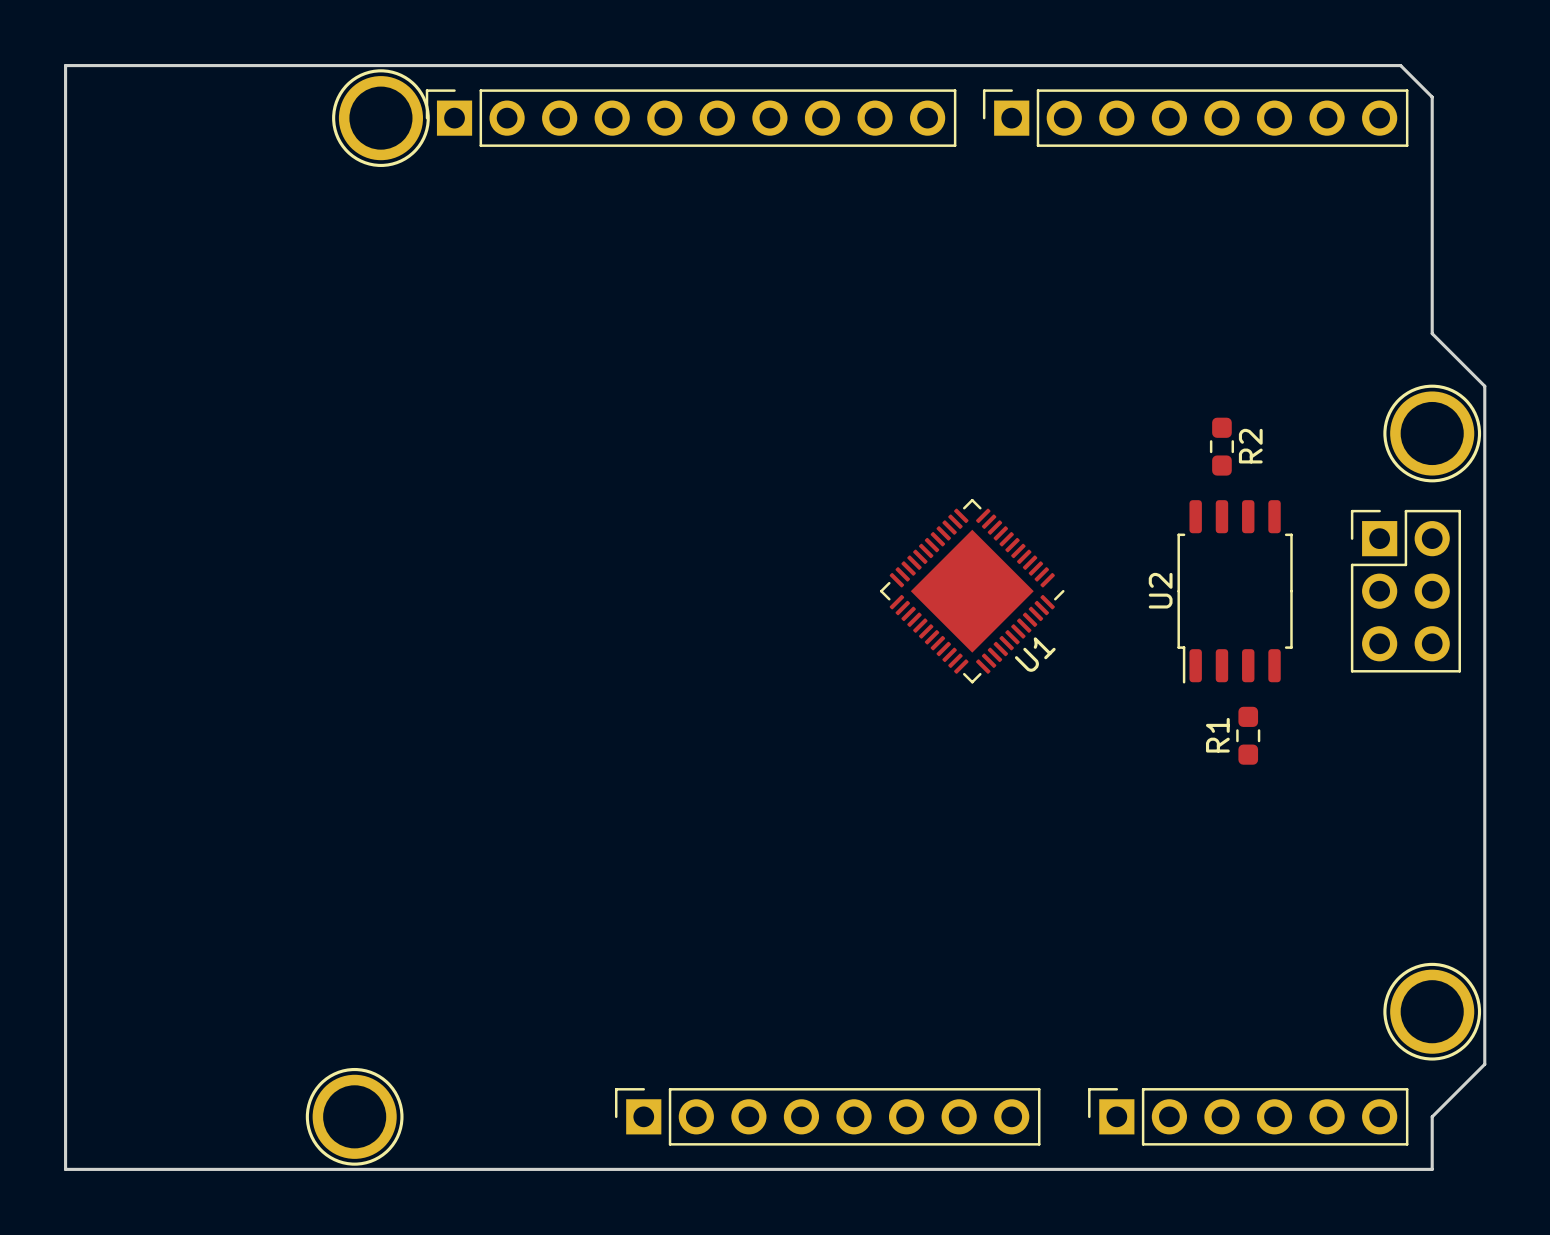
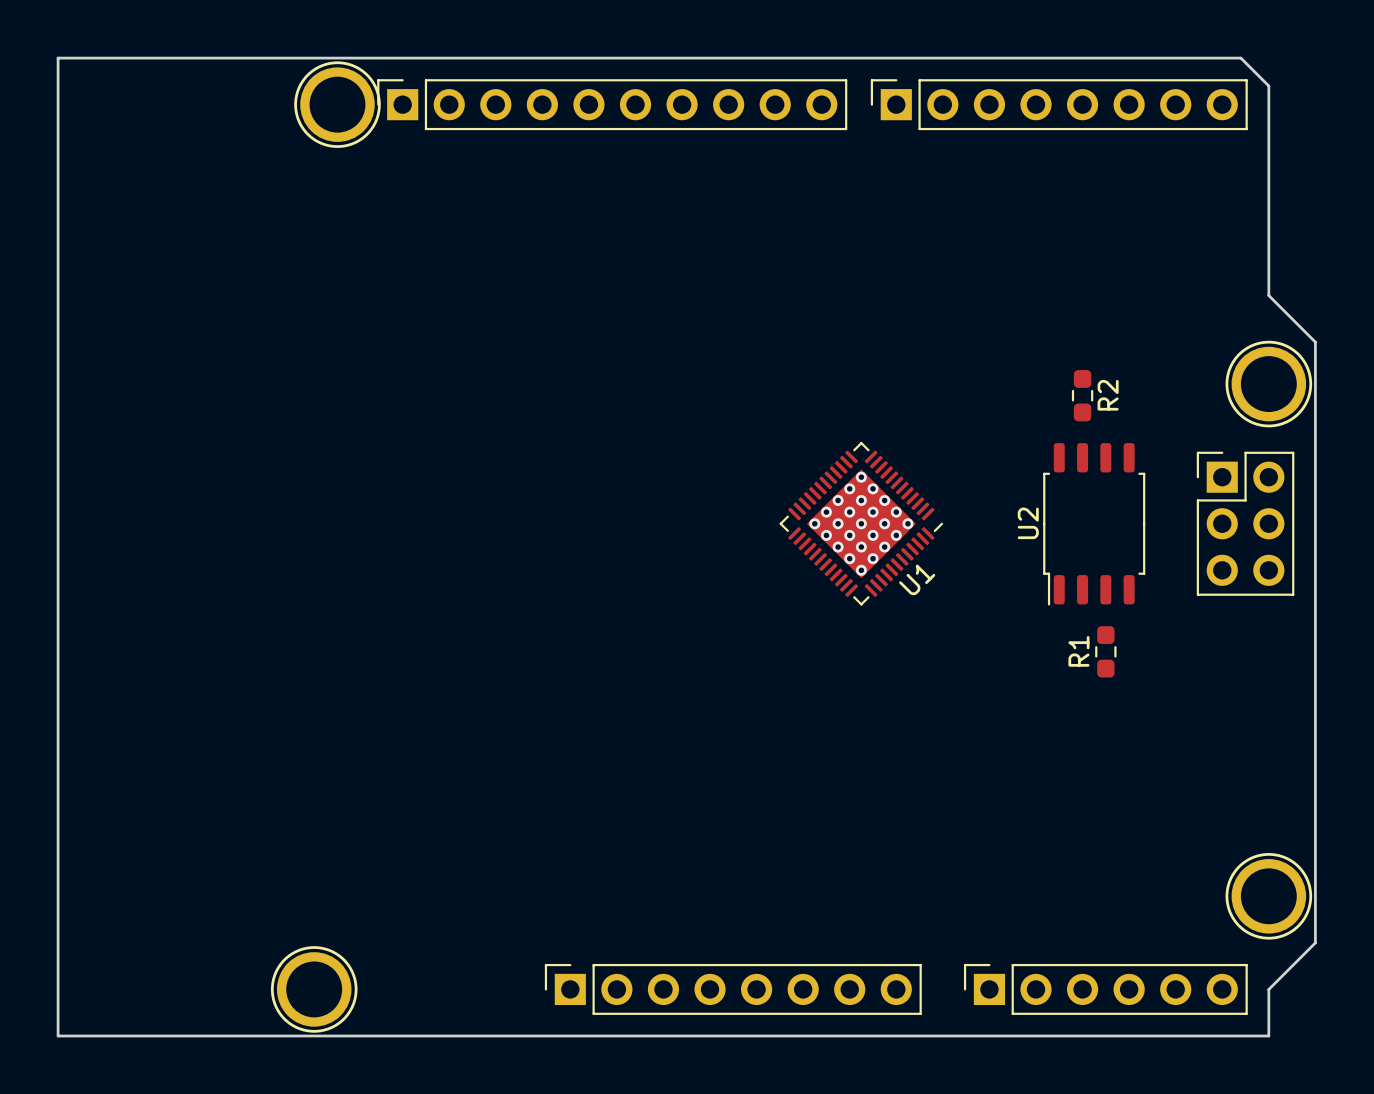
via: none -> (861, 477)
via: none -> (849, 488)
via: none -> (873, 488)
via: none -> (838, 500)
via: none -> (861, 500)
via: none -> (884, 500)
via: none -> (826, 512)
via: none -> (849, 512)
via: none -> (873, 512)
via: none -> (896, 512)
via: none -> (814, 523)
via: none -> (838, 523)
via: none -> (861, 523)
via: none -> (884, 523)
via: none -> (907, 523)
via: none -> (826, 535)
via: none -> (849, 535)
via: none -> (873, 535)
via: none -> (896, 535)
via: none -> (838, 547)
via: none -> (861, 547)
via: none -> (884, 547)
via: none -> (849, 558)
via: none -> (873, 558)
via: none -> (861, 570)

